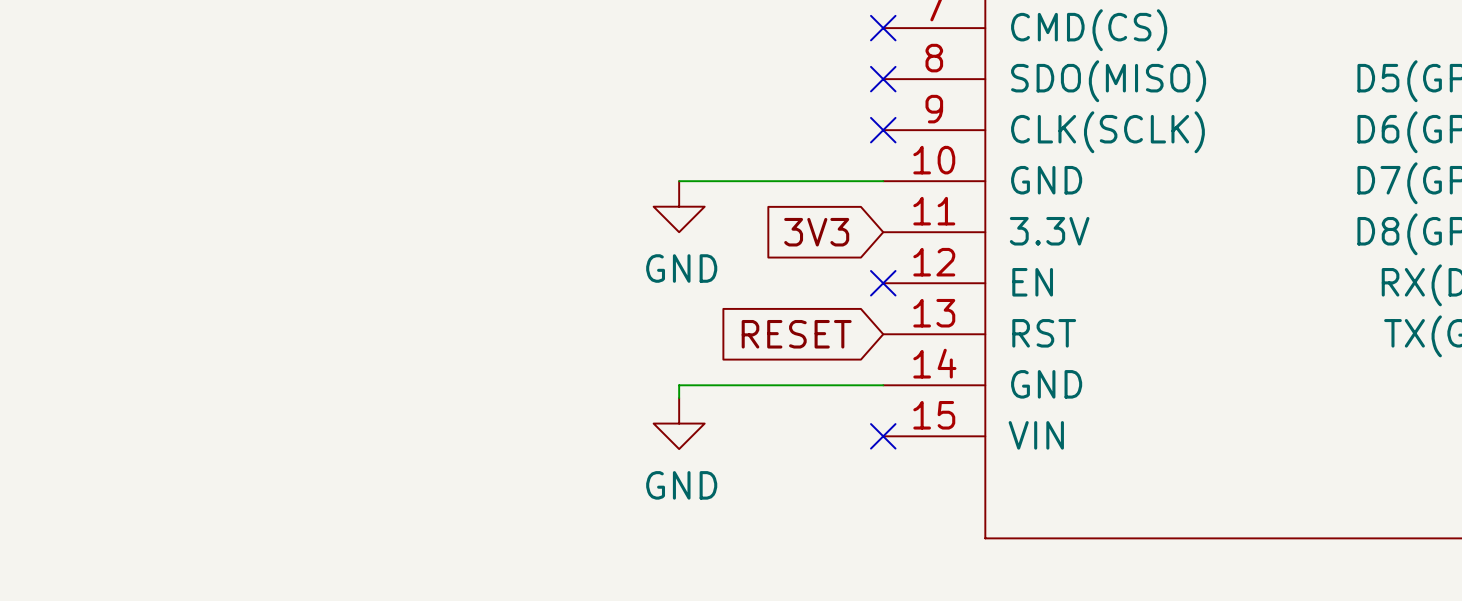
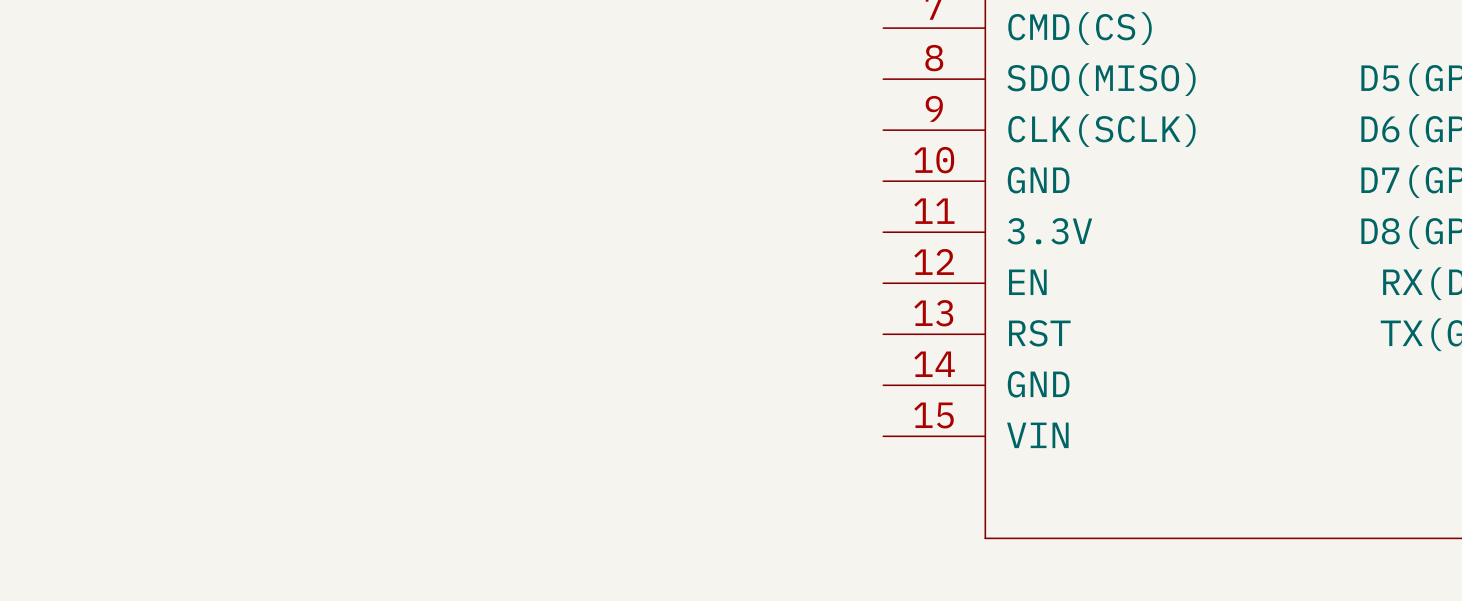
no-connect mark: (883, 28) -> none
no-connect mark: (883, 79) -> none
no-connect mark: (883, 130) -> none
wire: (679, 181) (883, 181) -> none
power symbol: GND (679, 206) -> none
global label: 3V3 (816, 232) -> none
no-connect mark: (883, 283) -> none
global label: RESET (796, 334) -> none
wire: (883, 385) (679, 385) (679, 398) -> none
power symbol: GND (679, 423) -> none
no-connect mark: (883, 436) -> none

